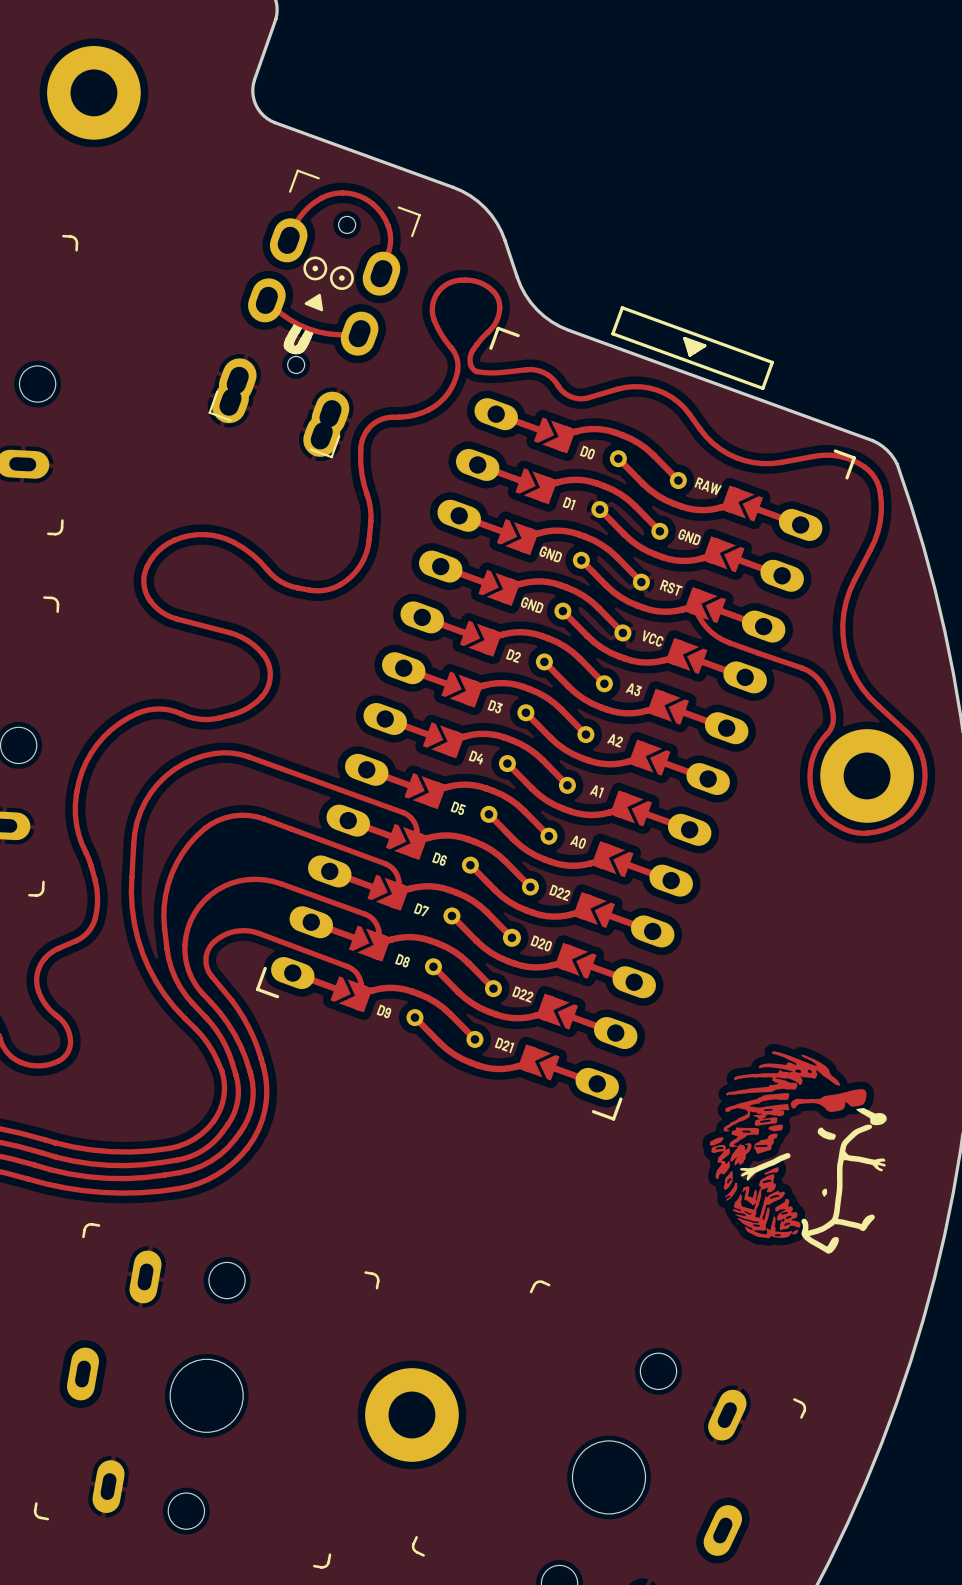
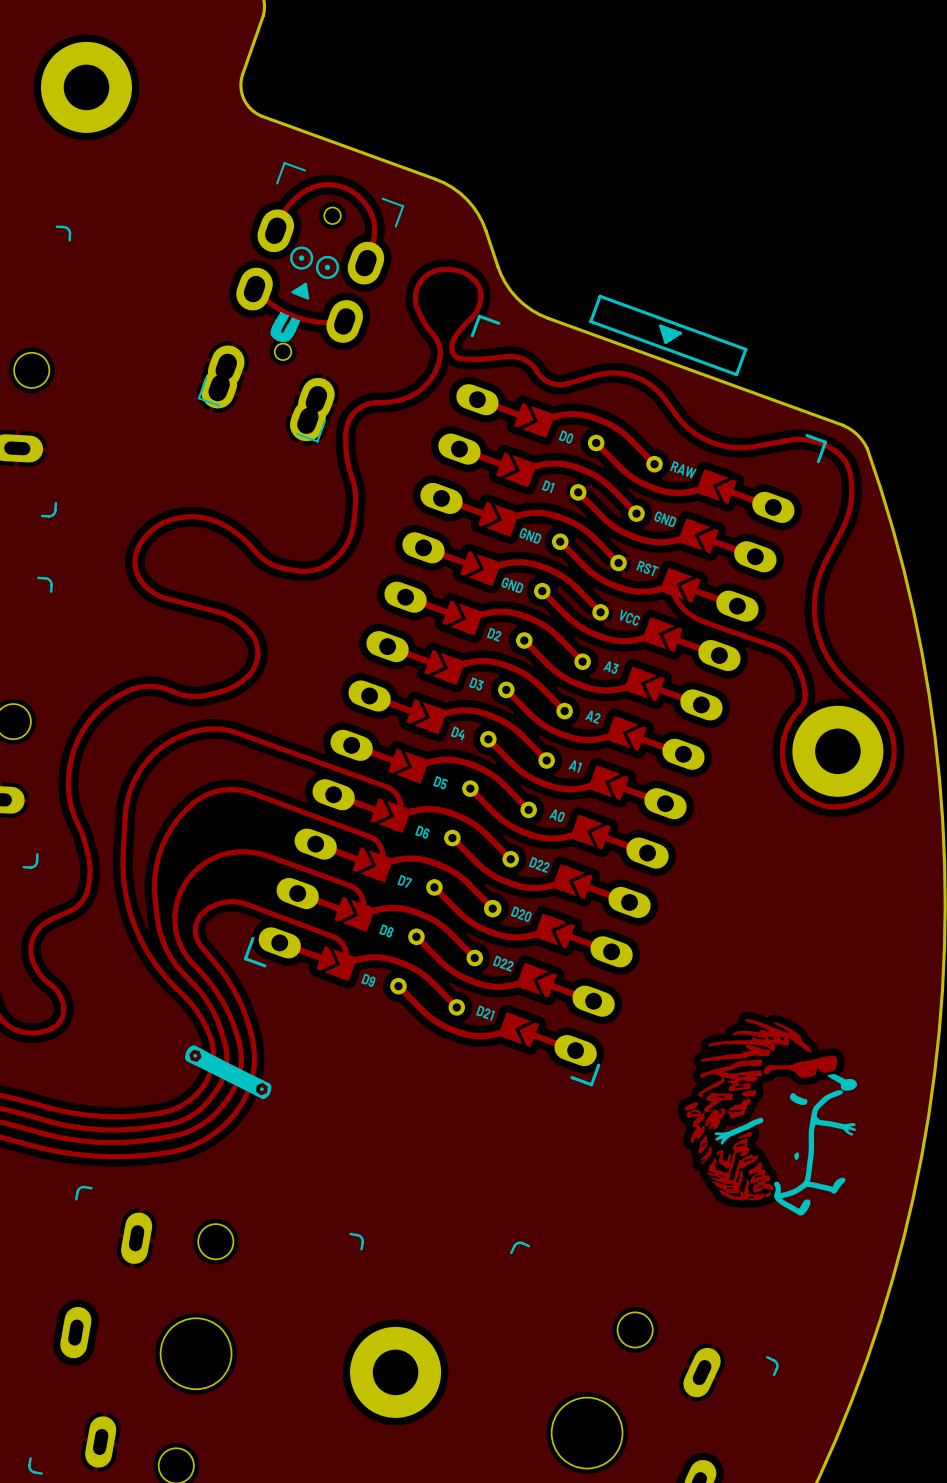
drawing: none -> [185, 1045, 272, 1100]

